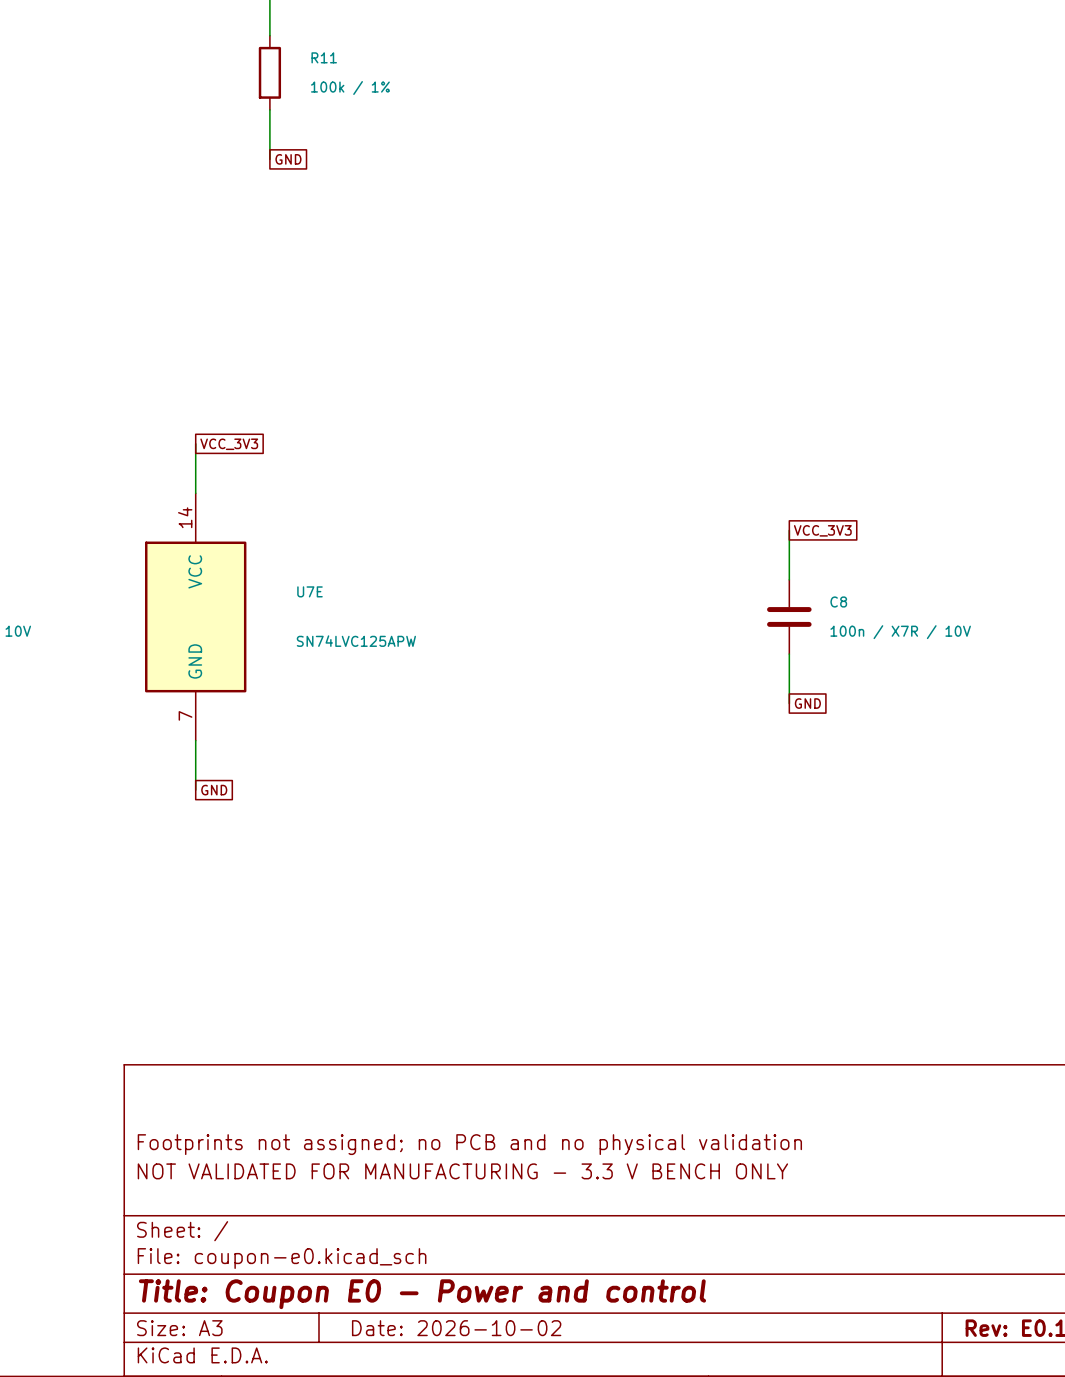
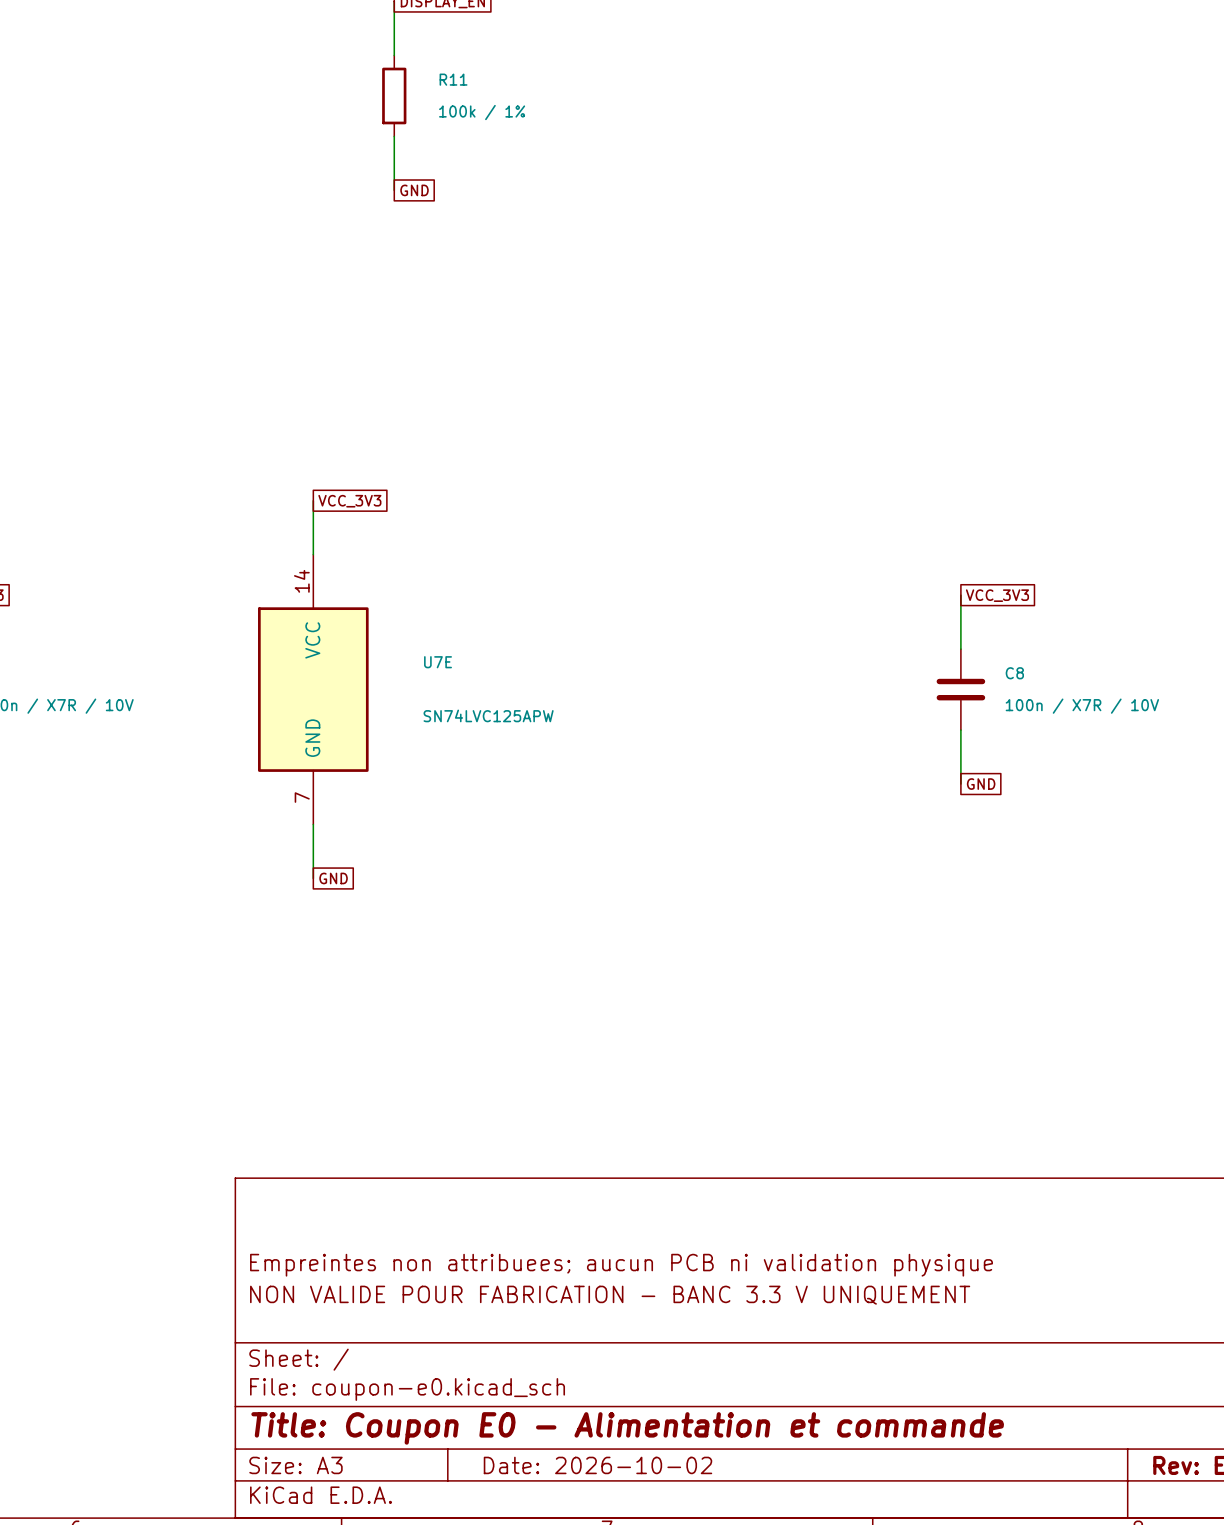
title block: Footprints not assigned; no PCB and no physical validation (469, 1144) -> Empreintes non attribuees; aucun PCB ni validation physique (621, 1265)
title block: NOT VALIDATED FOR MANUFACTURING - 3.3 V BENCH ONLY (462, 1171) -> NON VALIDE POUR FABRICATION - BANC 3.3 V UNIQUEMENT (610, 1295)
title block: Title: Coupon E0 - Power and control (422, 1294) -> Title: Coupon E0 - Alimentation et commande (627, 1428)

